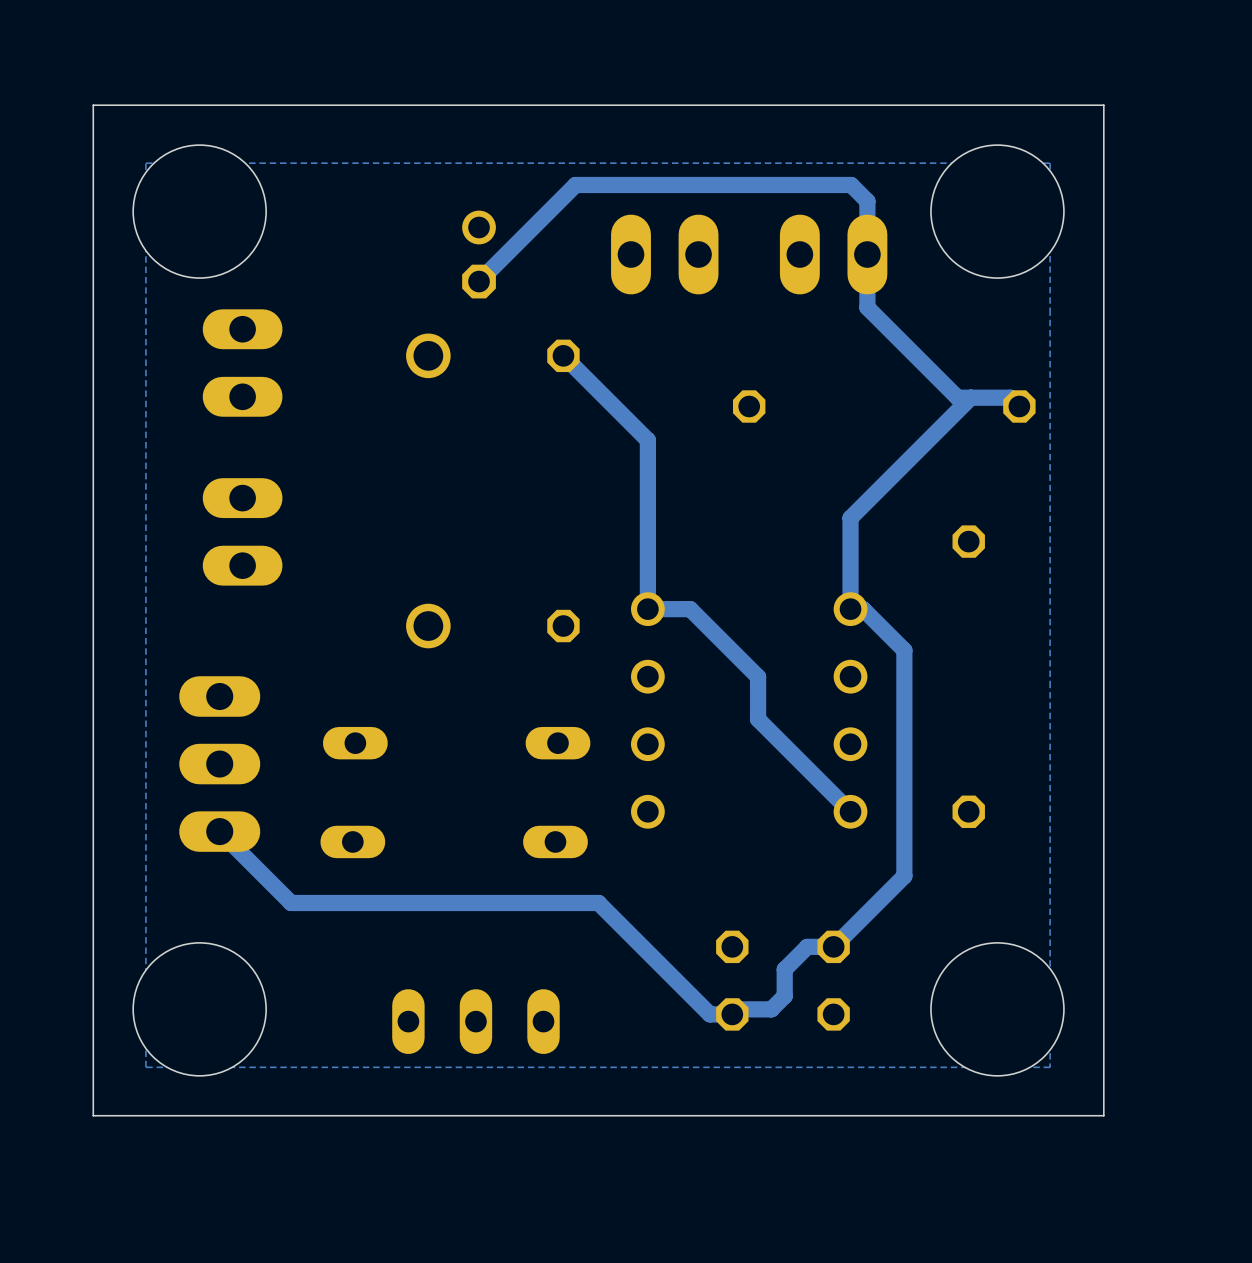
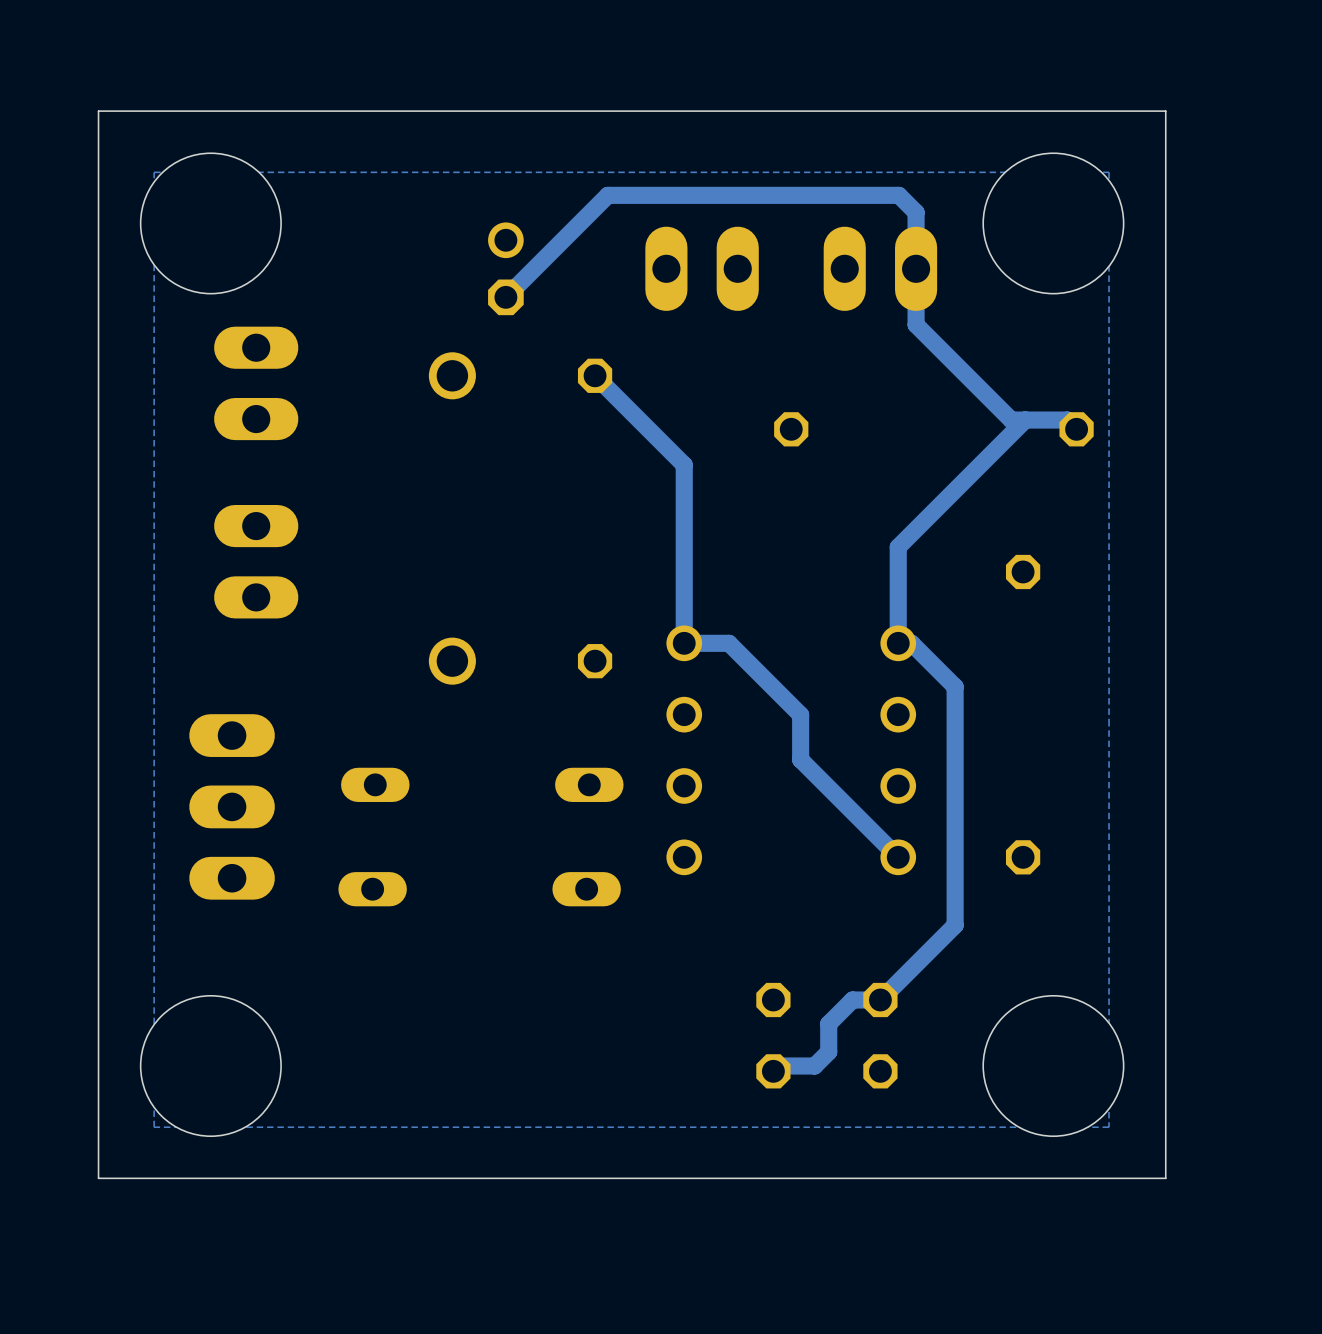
track: (219, 831) (291, 902) (598, 902) (709, 1014) (732, 1014) -> none
part: (475, 1021) -> none

